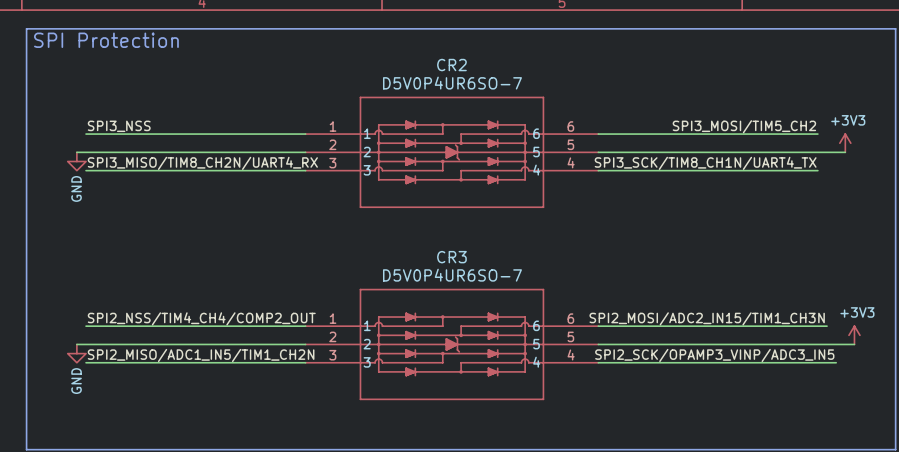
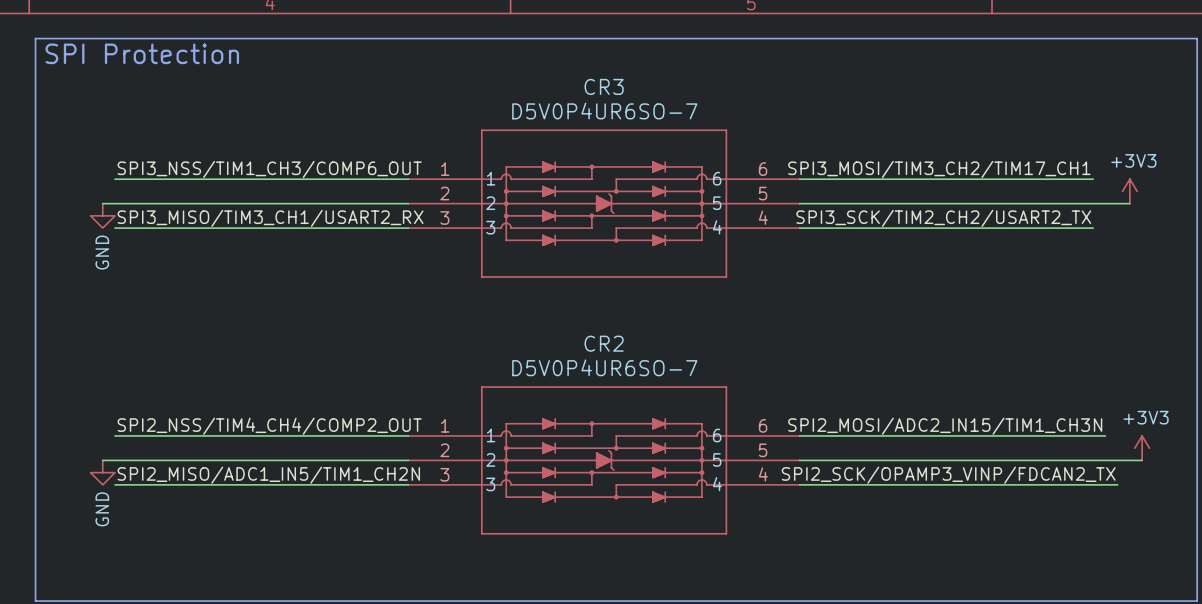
CR2 name: CR2 (451, 65) -> CR3 (604, 86)
label: SPI3_NSS (119, 126) -> SPI3_NSS/TIM1_CH3/COMP6_OUT (269, 169)
label: SPI3_MOSI/TIM5_CH2 (744, 126) -> SPI3_MOSI/TIM3_CH2/TIM17_CH1 (939, 169)
label: SPI3_MISO/TIM8_CH2N/UART4_RX (202, 163) -> SPI3_MISO/TIM3_CH1/USART2_RX (270, 218)
label: SPI3_SCK/TIM8_CH1N/UART4_TX (705, 163) -> SPI3_SCK/TIM2_CH2/USART2_TX (943, 218)
CR3 name: CR3 (451, 257) -> CR2 (604, 343)
label: SPI2_SCK/OPAMP3_VINP/ADC3_IN5 (714, 355) -> SPI2_SCK/OPAMP3_VINP/FDCAN2_TX (948, 475)

